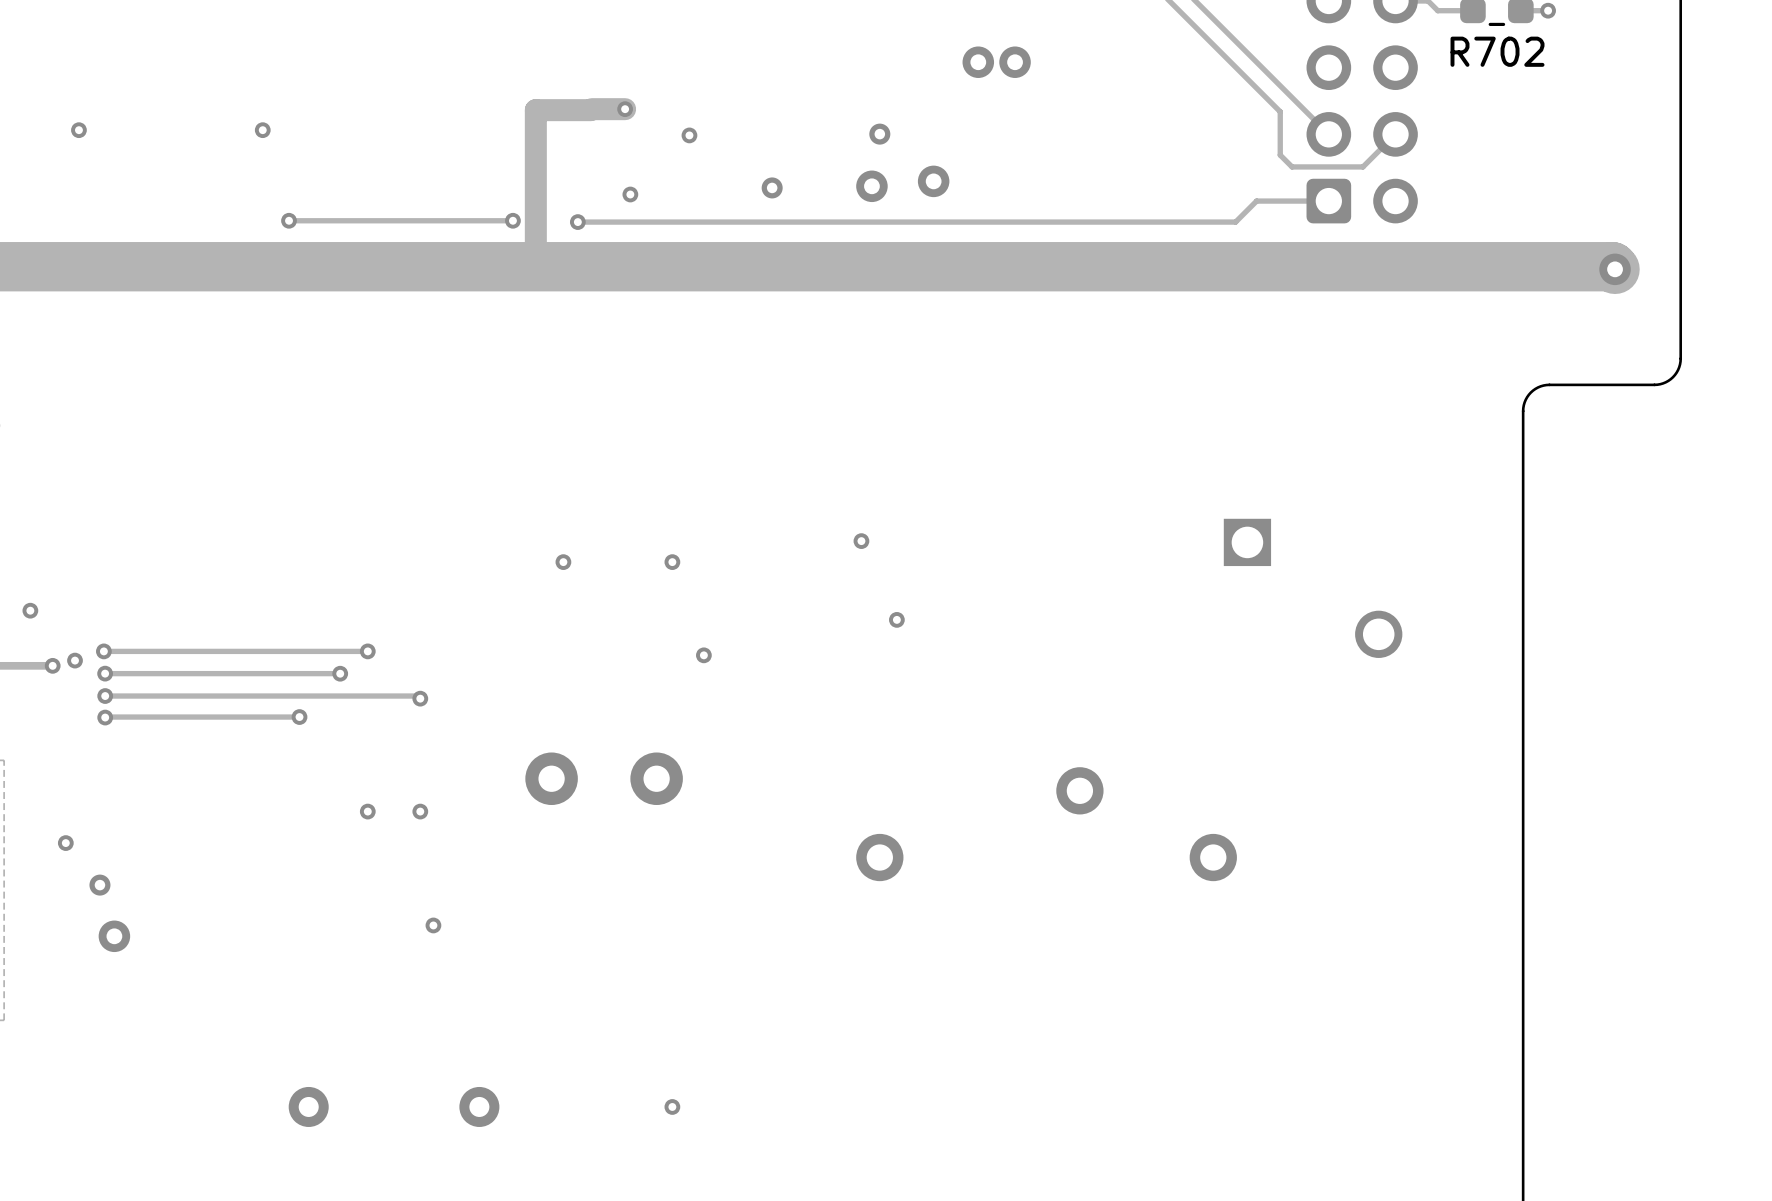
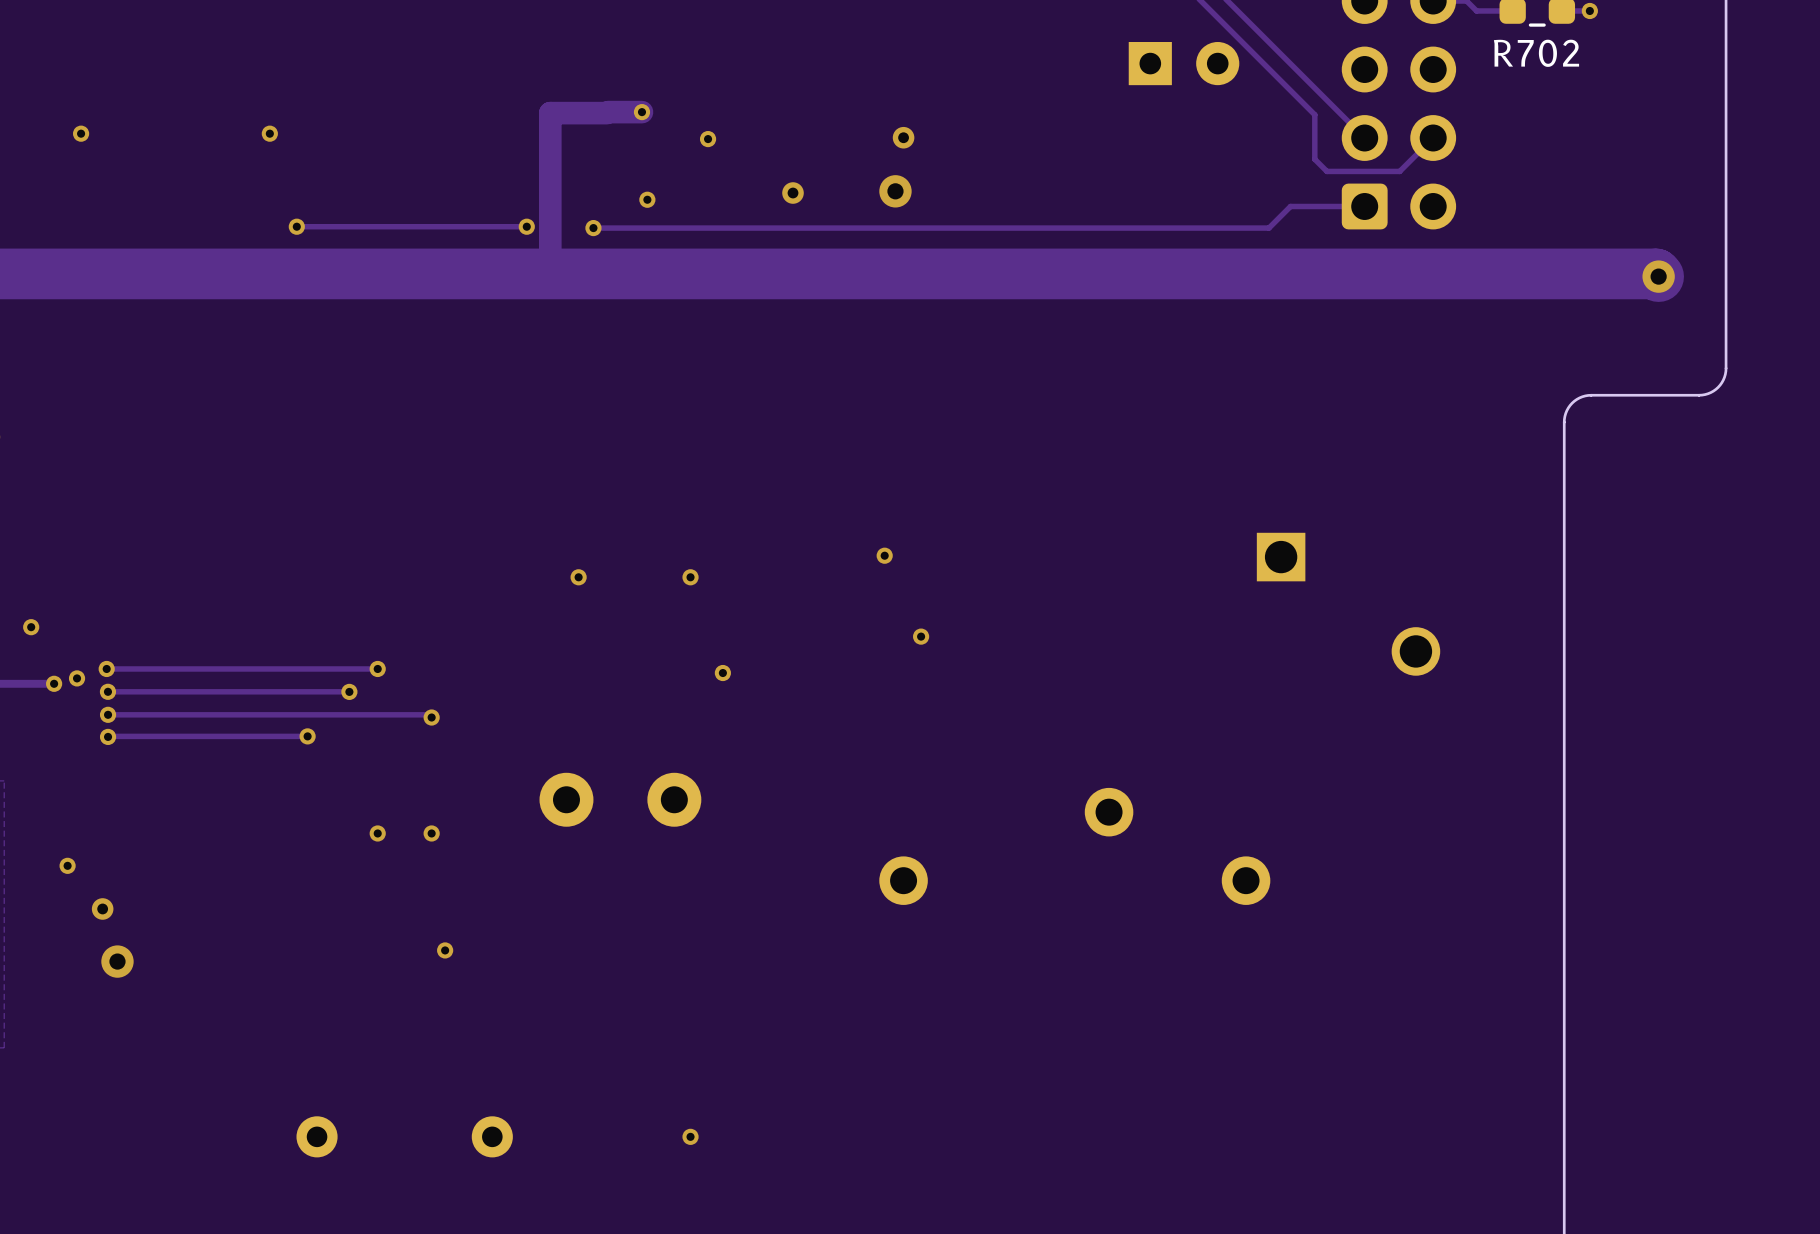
part: none -> (1184, 63)
via: (978, 62) -> none
via: (1015, 62) -> none
via: (933, 181) -> none

